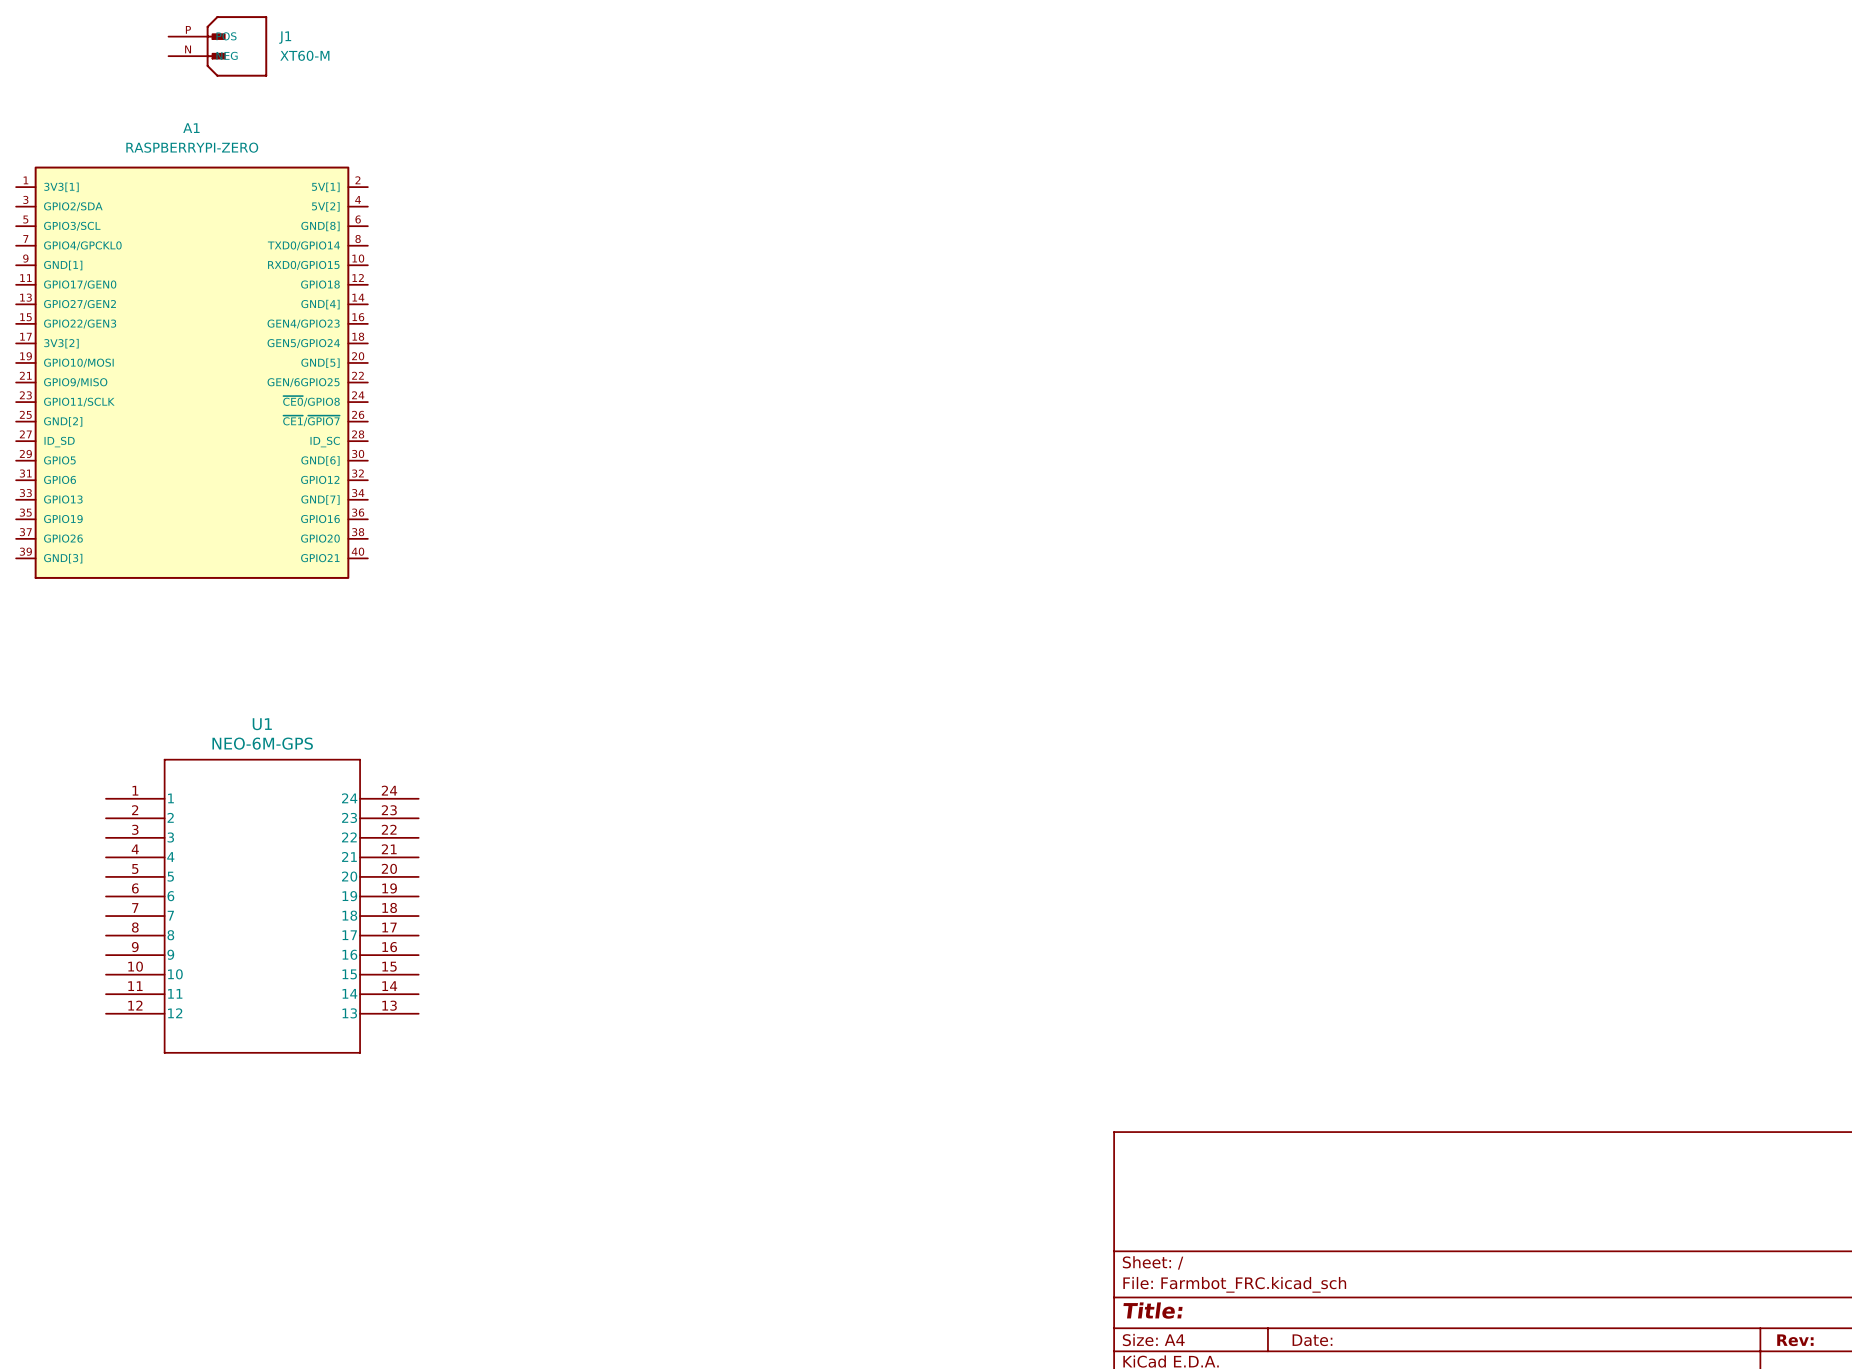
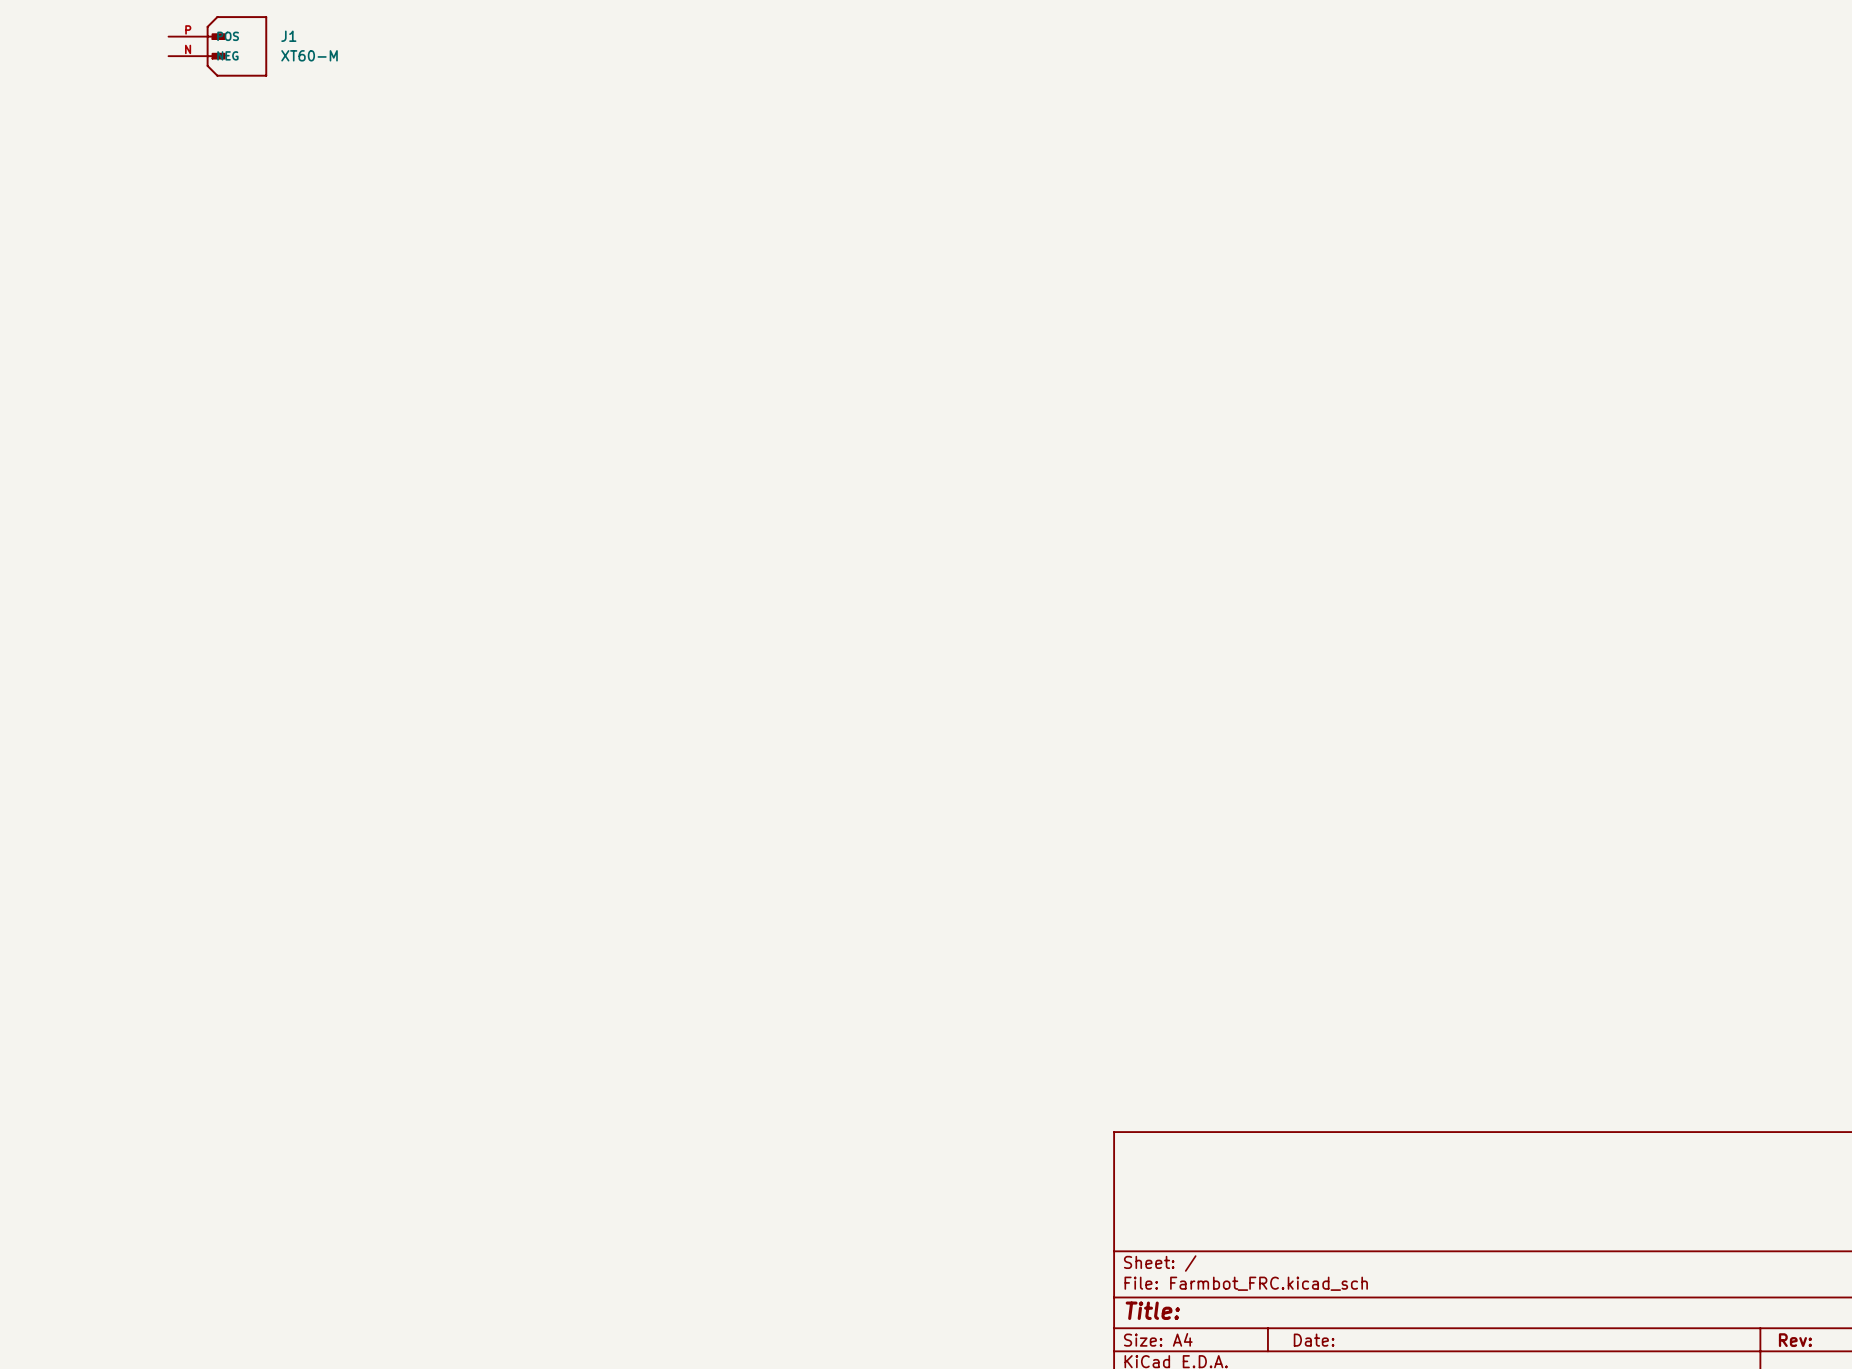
A1: RASPBERRYPI-ZERO (191, 372) -> none
U1: NEO-6M-GPS (262, 906) -> none

